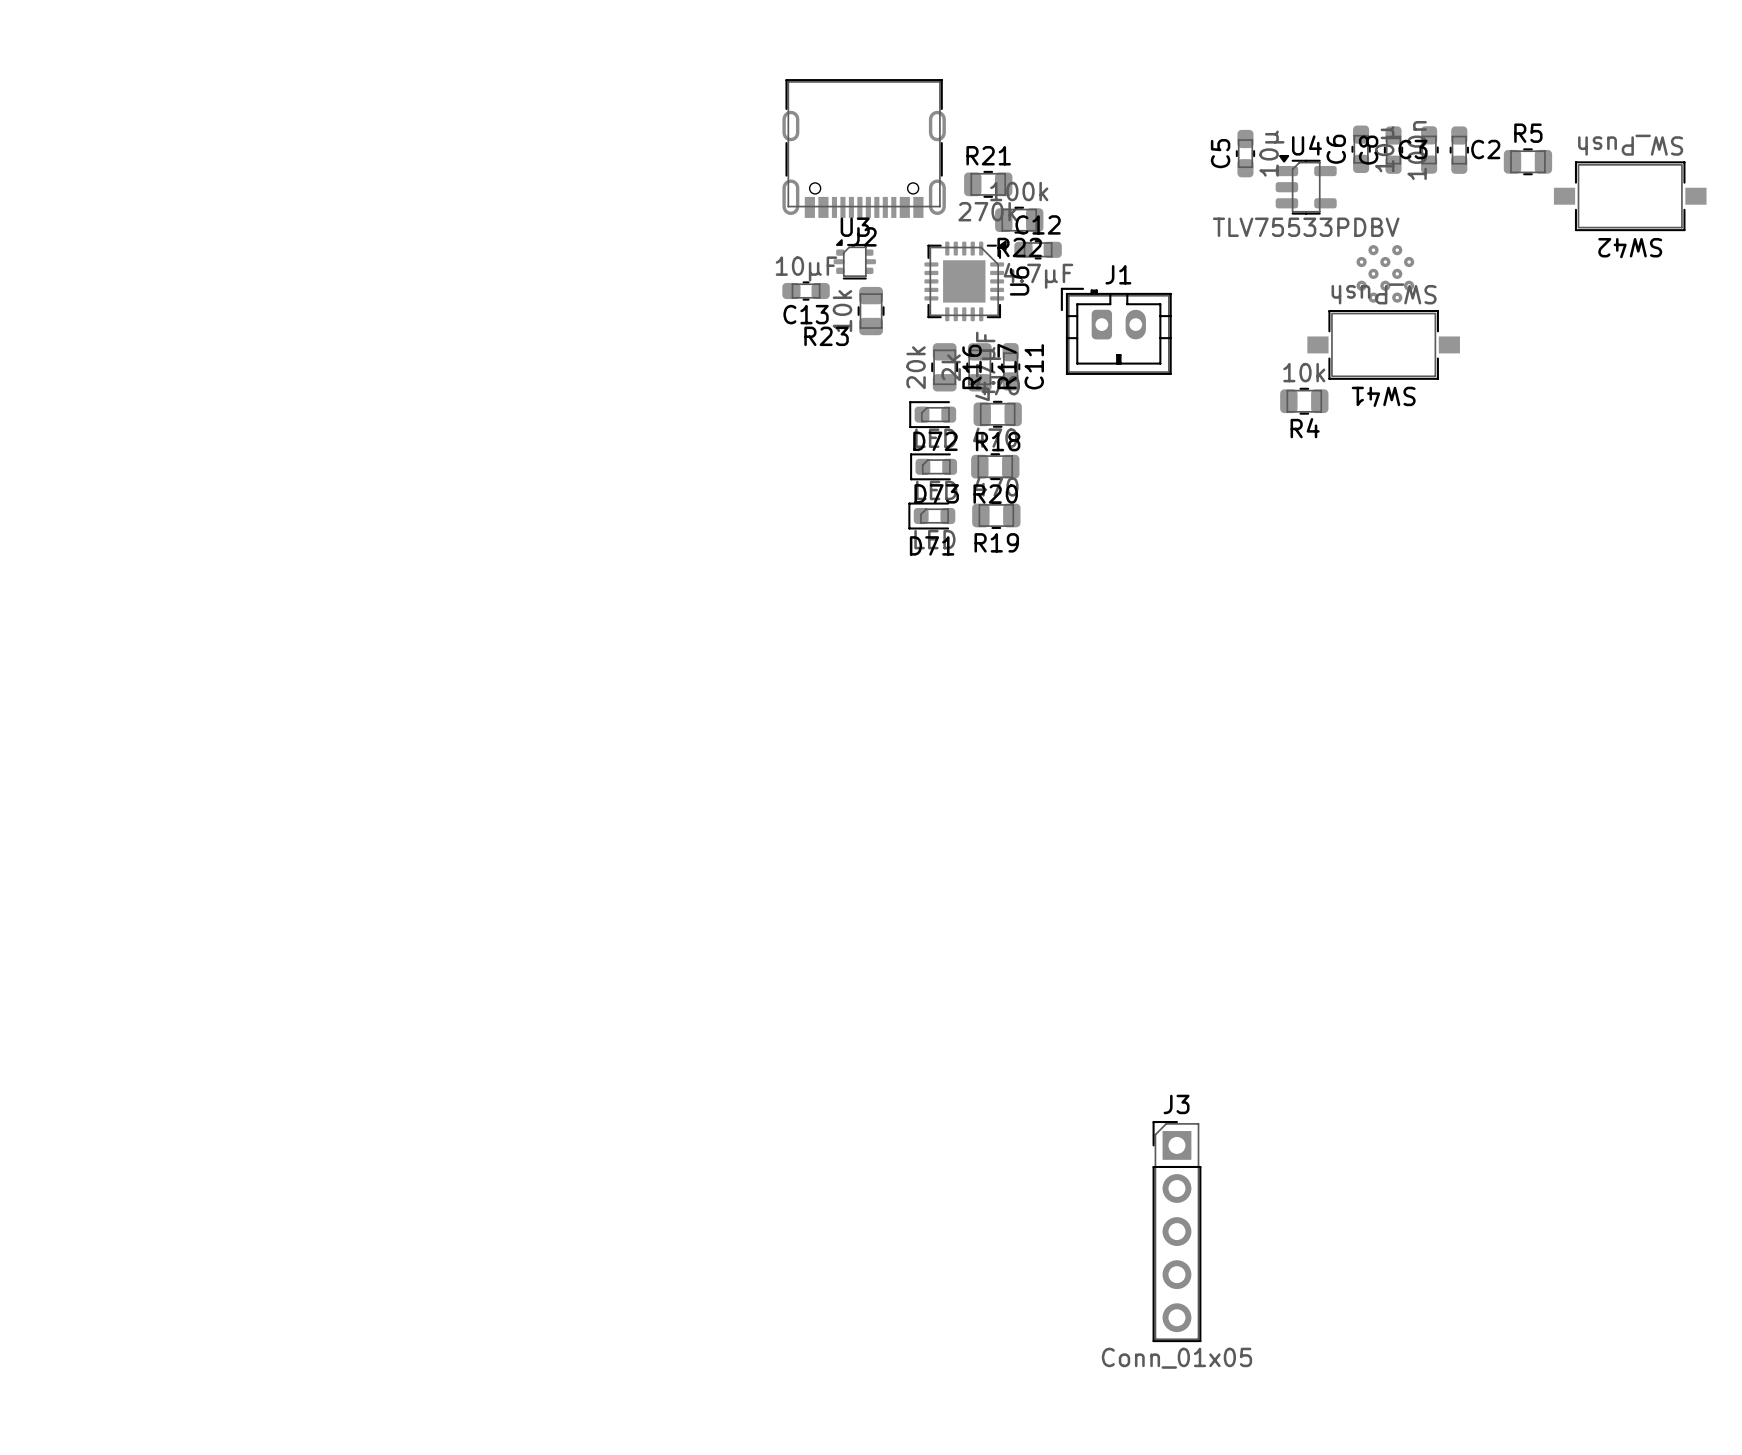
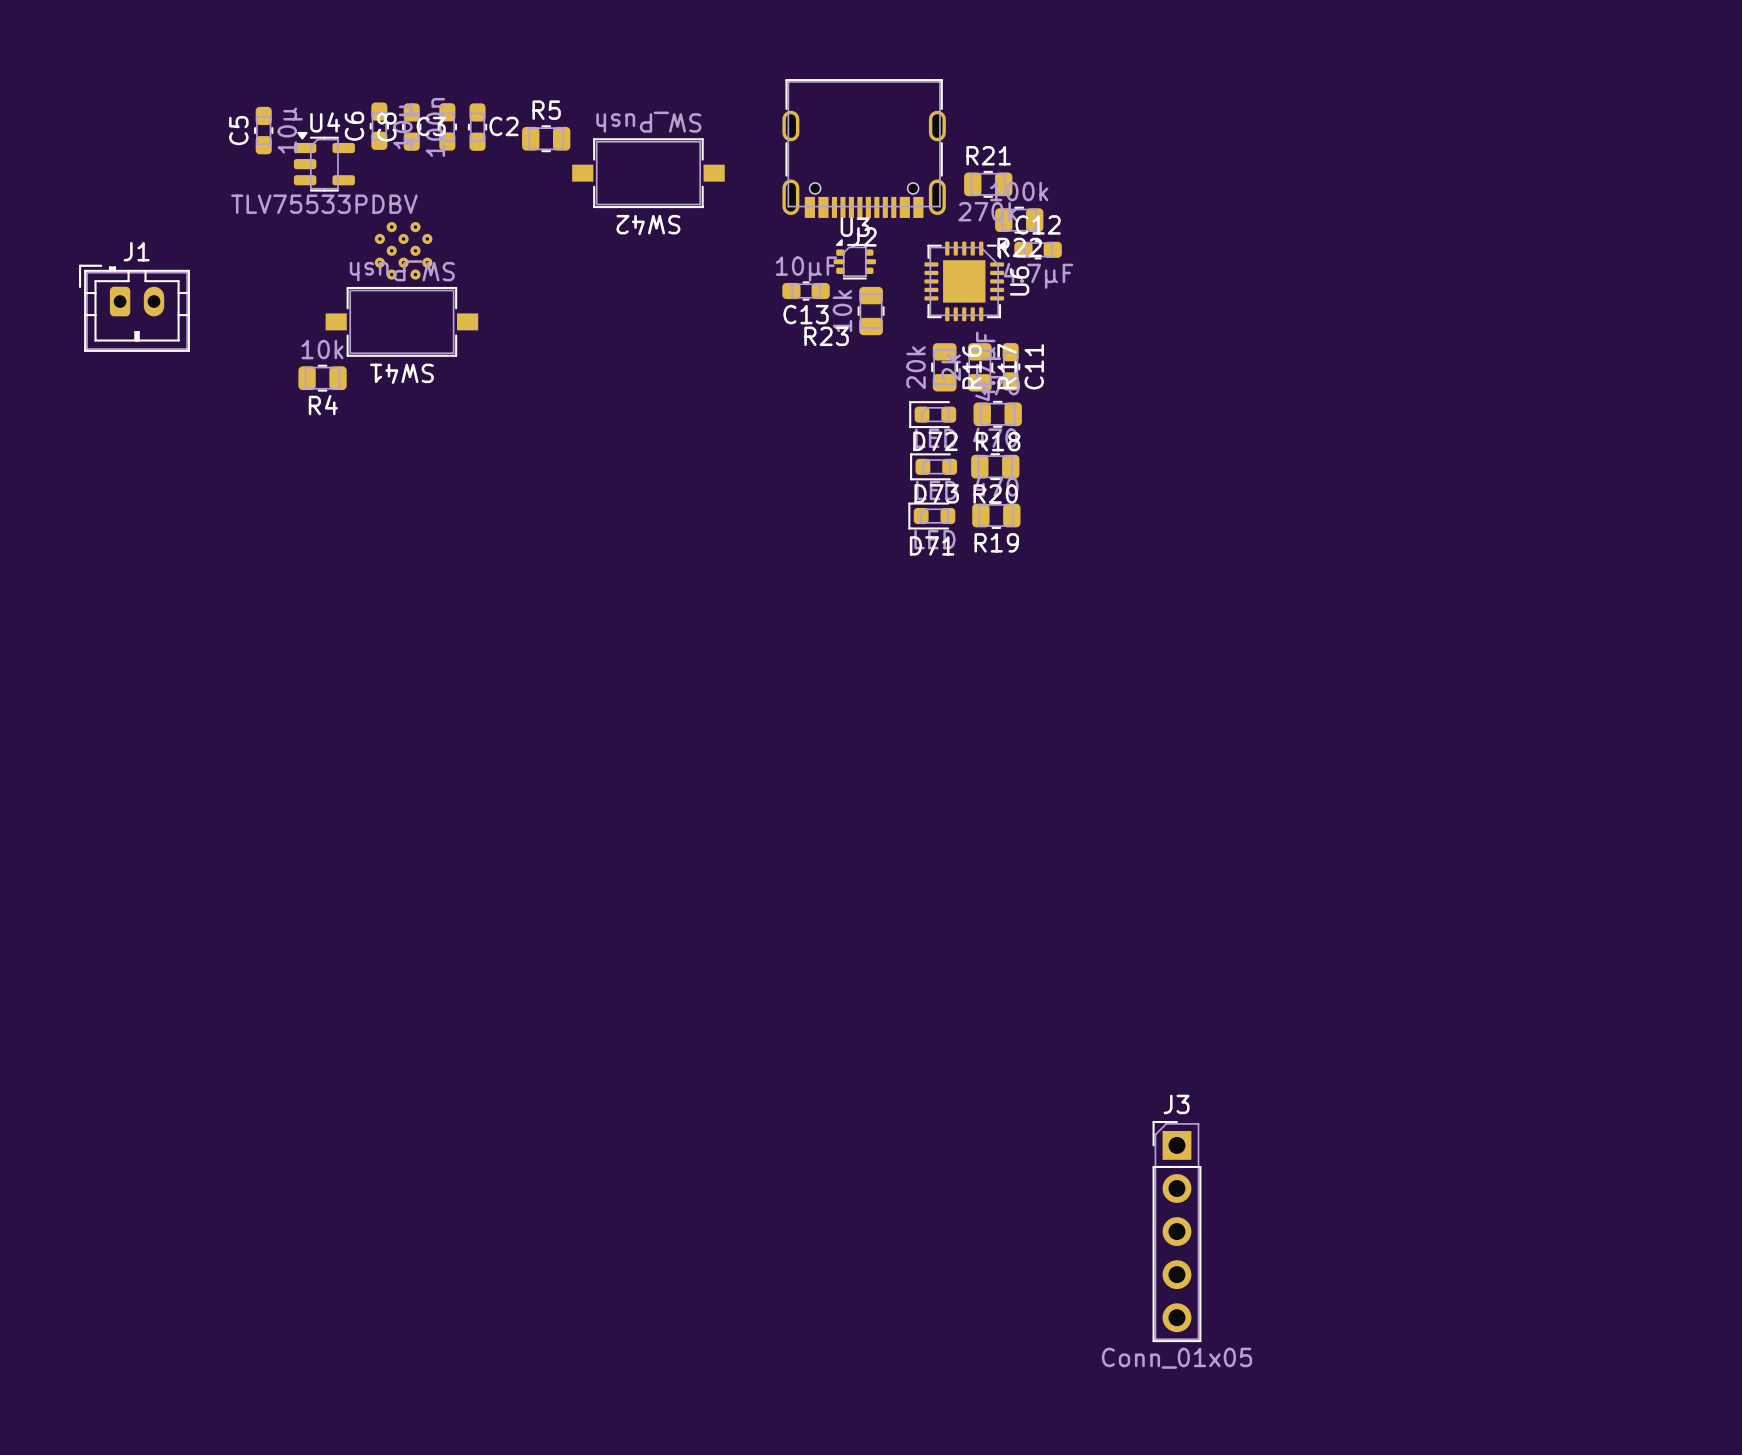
C6 position: (1361, 149) -> (379, 126)
C3 position: (1429, 149) -> (447, 126)
C8 position: (1393, 150) -> (411, 127)
C2 position: (1459, 150) -> (477, 127)
C5 position: (1245, 153) -> (263, 130)
R5 position: (1527, 161) -> (546, 138)
U4 position: (1306, 184) -> (324, 161)
SW42 position: (1630, 196) -> (648, 173)
part: none -> (403, 250)
part: (1385, 273) -> none
J1 position: (1116, 331) -> (134, 308)
SW41 position: (1383, 344) -> (401, 321)
R4 position: (1304, 401) -> (322, 378)

